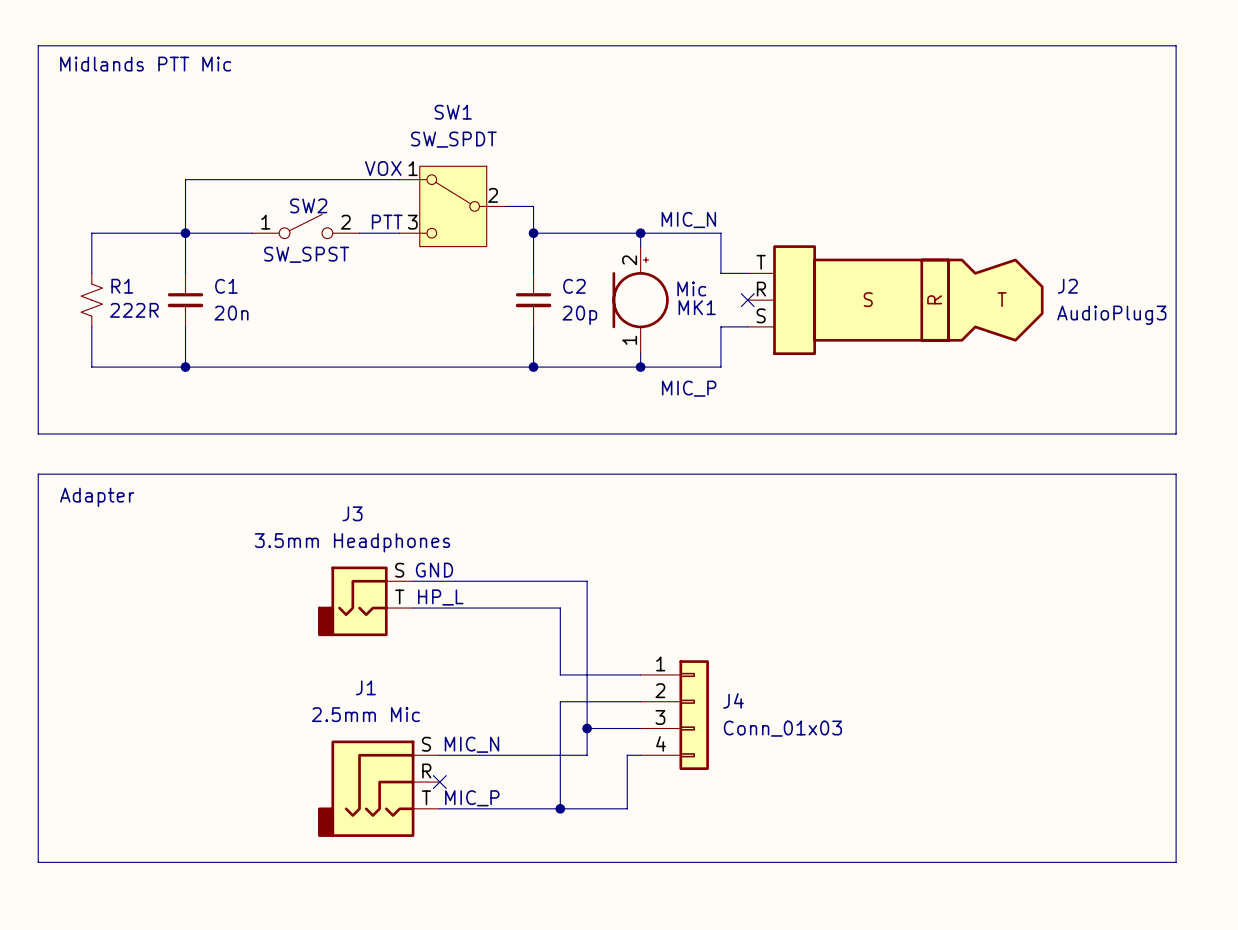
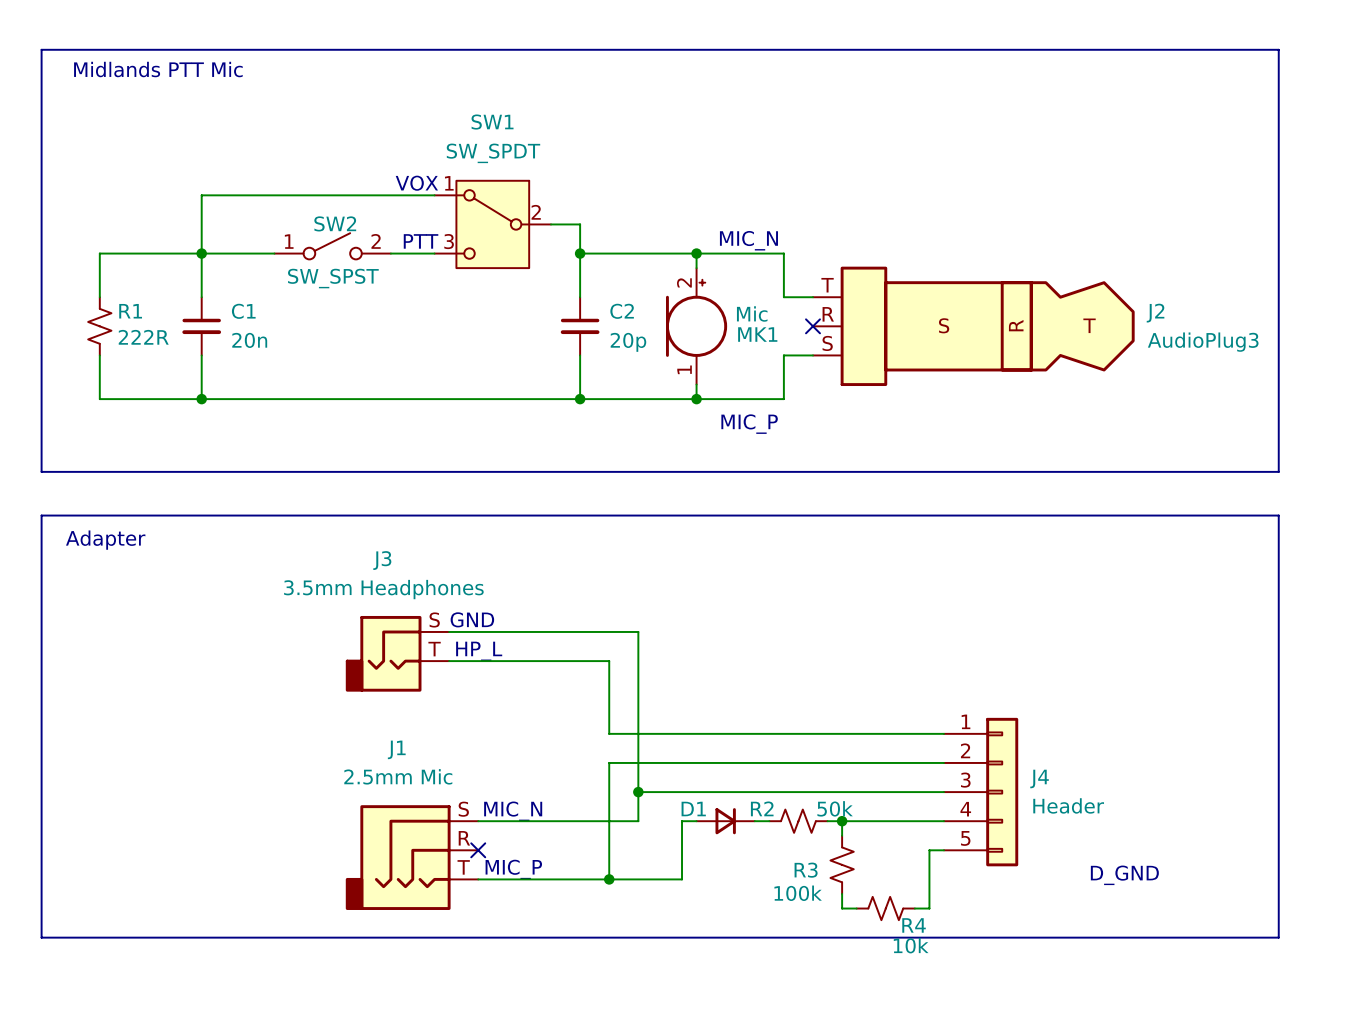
J4 symbol: [640, 660, 709, 771] -> [943, 717, 1019, 867]
wire: none -> (696, 733) (943, 733)
wire: none -> (696, 762) (943, 762)
wire: none -> (696, 792) (943, 792)
J4 value: Conn_01x03 (782, 728) -> Header (1068, 805)
D1: none -> (725, 821)
R2: none -> 50k (798, 821)
wire: none -> (827, 821) (943, 821)
wire: none -> (842, 821) (842, 835)
junction: none -> (842, 821)
wire: none -> (943, 850) (929, 850) (929, 908) (914, 908)
R3: none -> 100k (842, 864)
text: none -> D_GND (1124, 875)
wire: none -> (842, 893) (842, 908) (856, 908)
R4: none -> 10k (885, 908)

